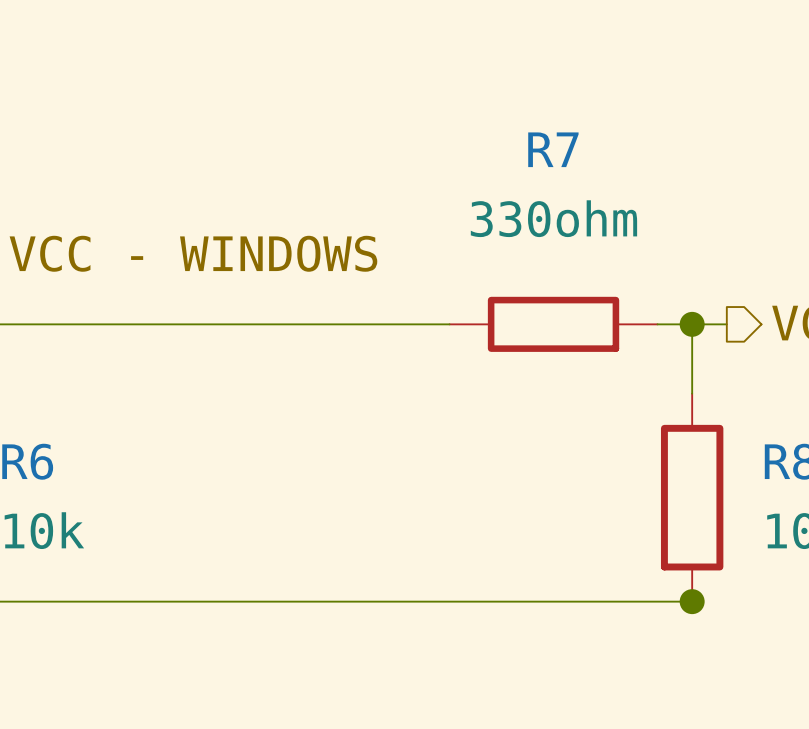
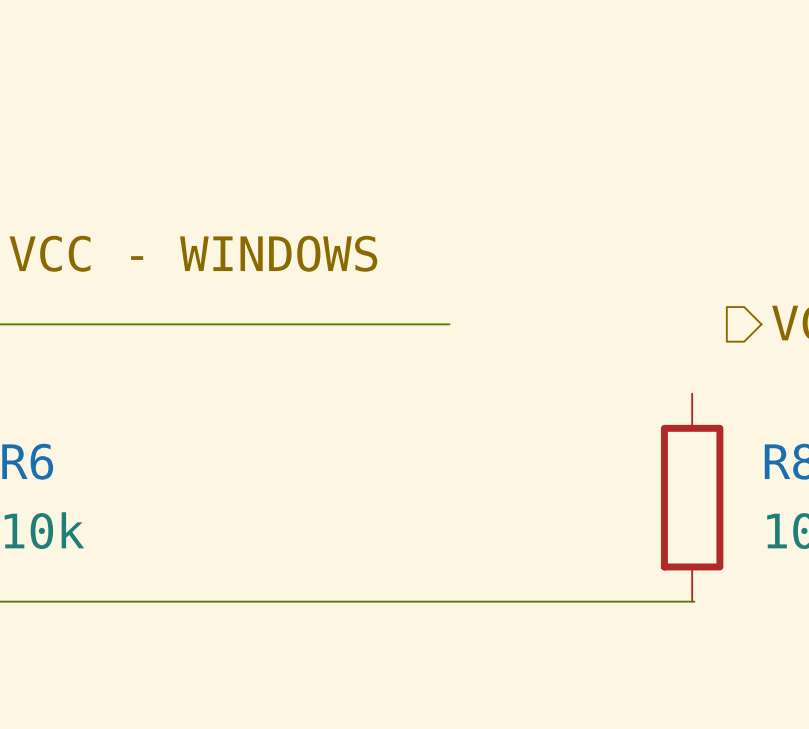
R7: 330ohm (553, 324) -> none
wire: (657, 324) (726, 324) -> none
wire: (692, 324) (692, 393) -> none
junction: (692, 324) -> none
junction: (692, 601) -> none

